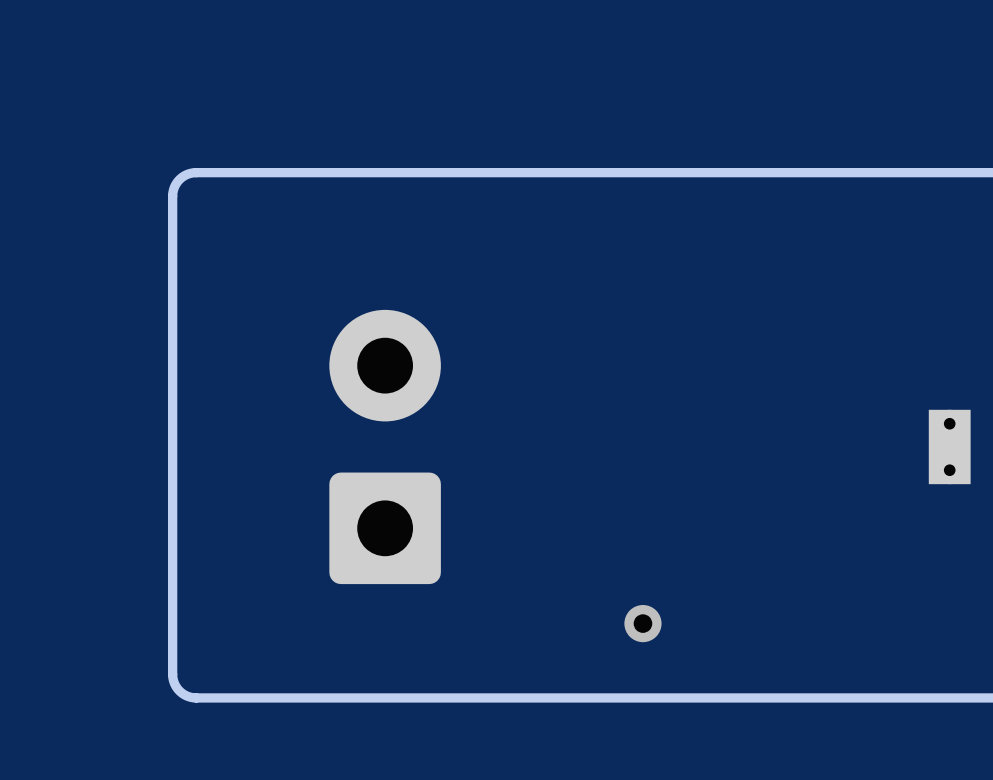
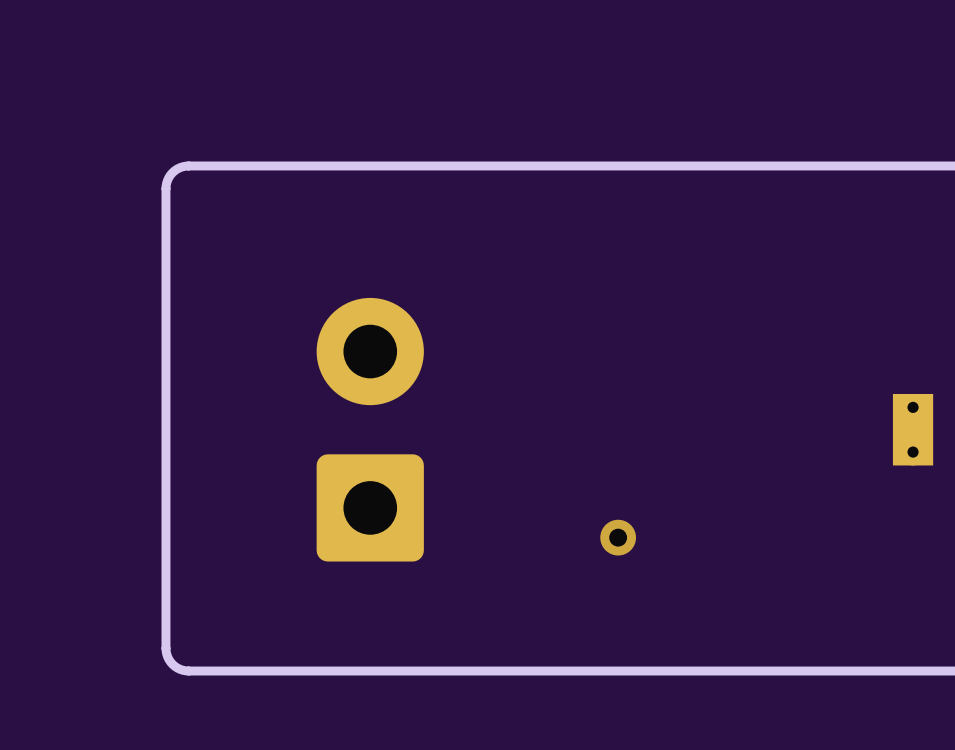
via position: (642, 623) -> (618, 537)

